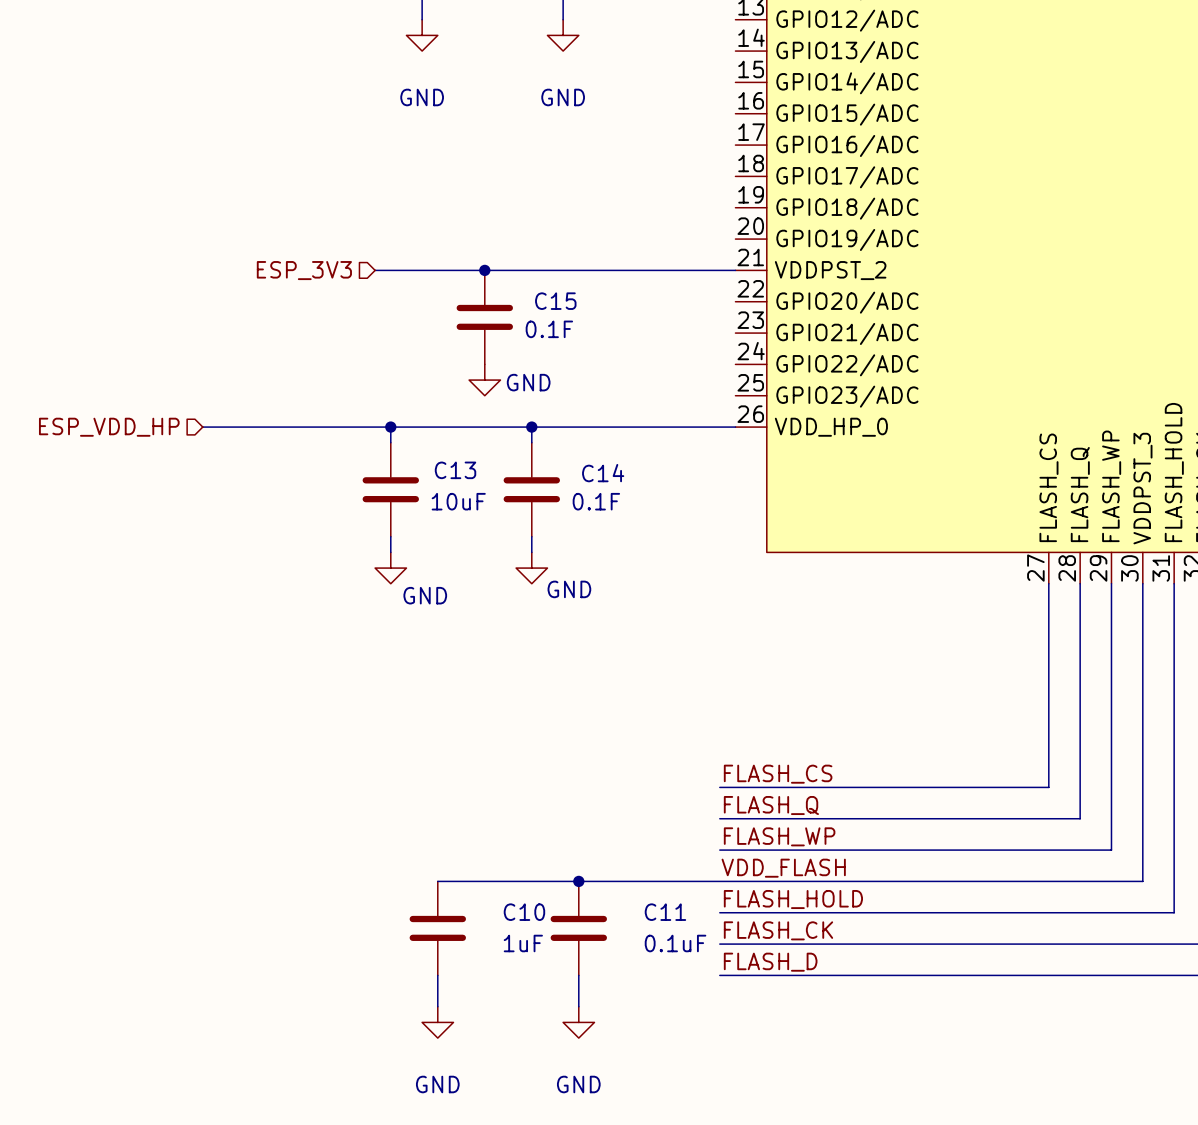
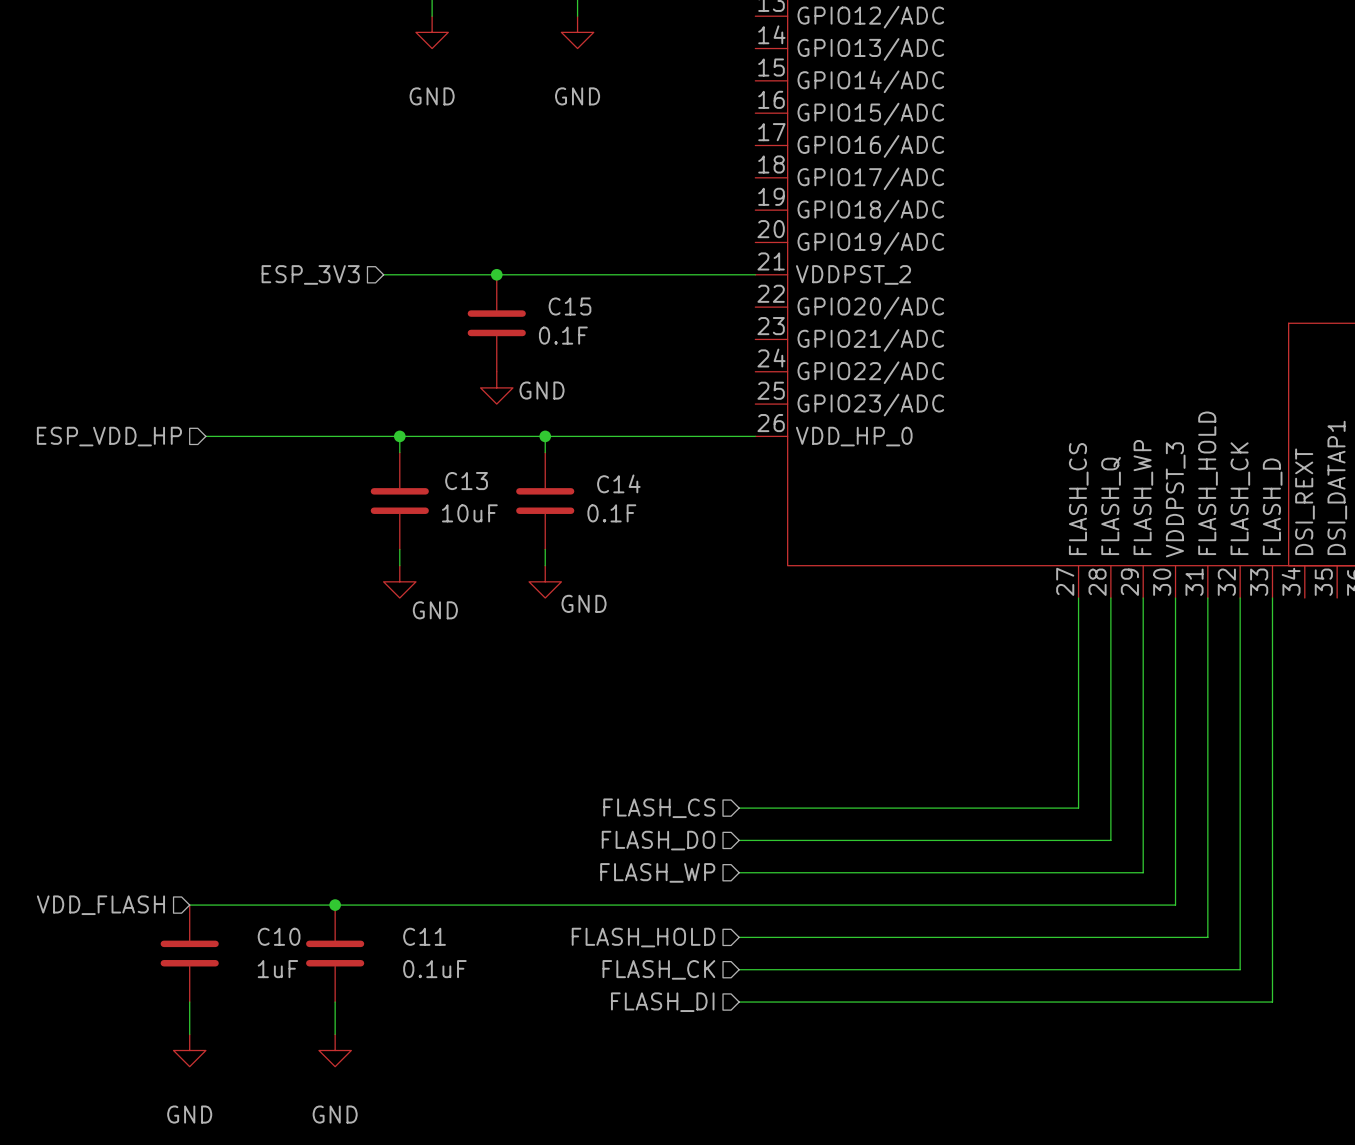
label: FLASH_CS (778, 774) -> none
hierarchical label: none -> FLASH_CS (659, 808)
label: FLASH_Q (771, 805) -> none
hierarchical label: none -> FLASH_DO (658, 840)
label: FLASH_WP (779, 836) -> none
hierarchical label: none -> FLASH_WP (657, 872)
label: VDD_FLASH (783, 868) -> none
hierarchical label: none -> VDD_FLASH (100, 905)
wire: none -> (189, 905) (448, 905)
junction: none -> (335, 905)
junction: (578, 881) -> none
label: FLASH_HOLD (793, 899) -> none
hierarchical label: none -> FLASH_HOLD (643, 937)
C10 position: (437, 928) -> (189, 953)
C11 position: (578, 928) -> (335, 953)
label: FLASH_CK (778, 930) -> none
hierarchical label: none -> FLASH_CK (658, 969)
label: FLASH_D (770, 962) -> none
wire: (437, 975) (437, 1006) -> (189, 1002) (189, 1034)
wire: (578, 975) (578, 1006) -> (335, 1002) (335, 1034)
hierarchical label: none -> FLASH_DI (662, 1002)
power symbol: none -> GND (189, 1050)
power symbol position: GND (437, 1022) -> GND (335, 1050)
power symbol: GND (578, 1022) -> none

